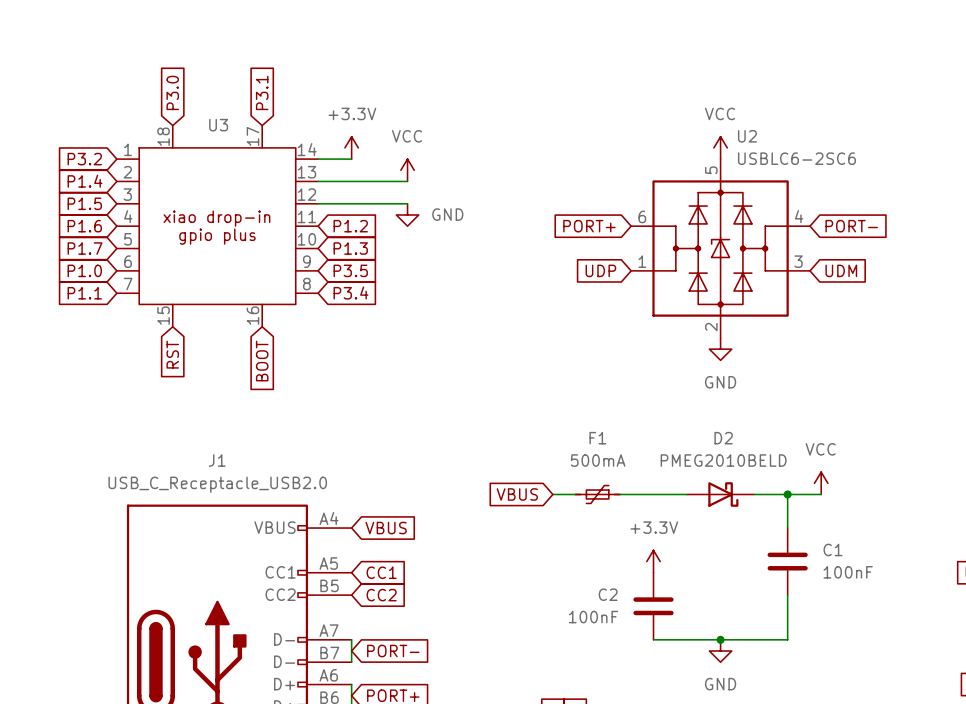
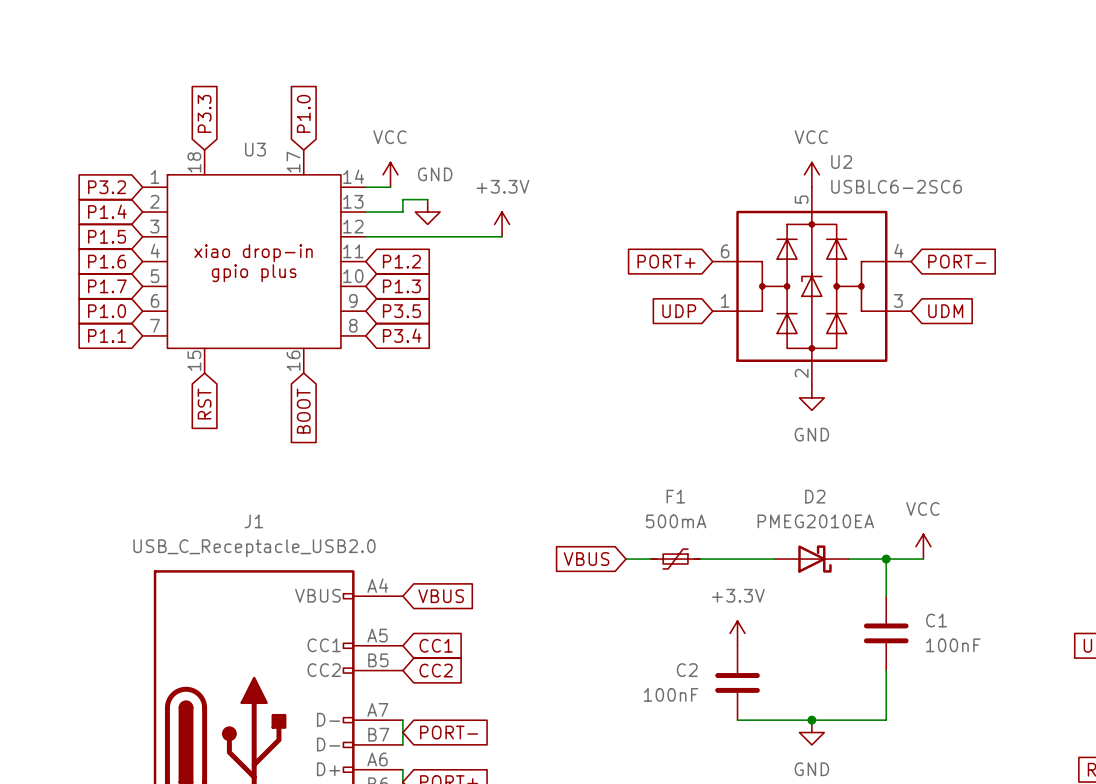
global label: P3.0 (172, 92) -> P3.3 (204, 113)
global label: P3.1 (262, 92) -> P1.0 (303, 113)
power symbol position: +3.3V (351, 147) -> +3.3V (502, 224)
wire: (340, 159) (351, 159) -> none
power symbol position: VCC (407, 170) -> VCC (390, 174)
wire: (351, 181) (407, 181) -> (402, 212) (402, 199) (427, 199)
wire: none -> (464, 236) (502, 236)
power symbol position: GND (407, 214) -> GND (427, 212)
power symbol text position: GND (447, 214) -> GND (435, 174)
D2 value: PMEG2010BELD (723, 460) -> PMEG2010EA (815, 521)

